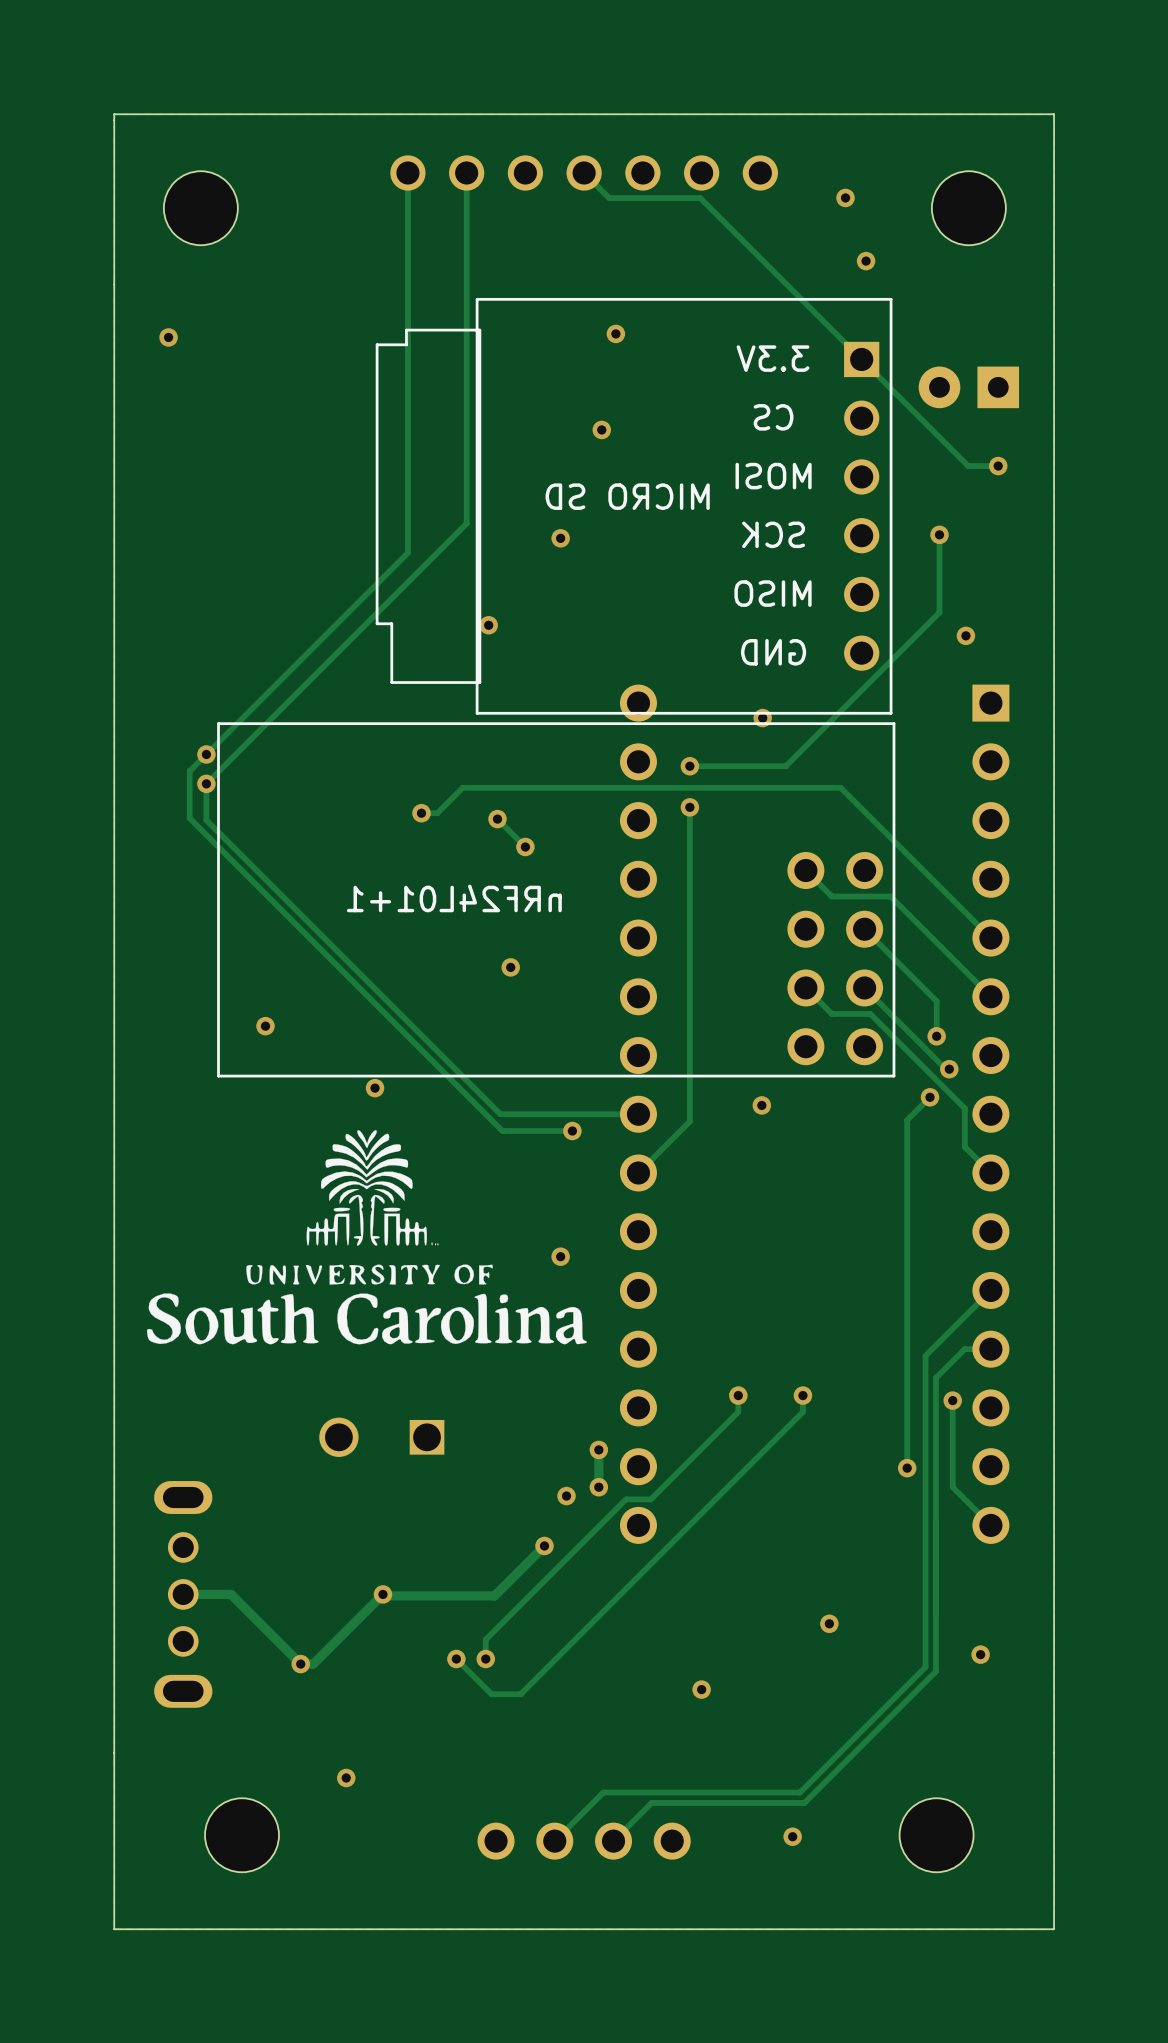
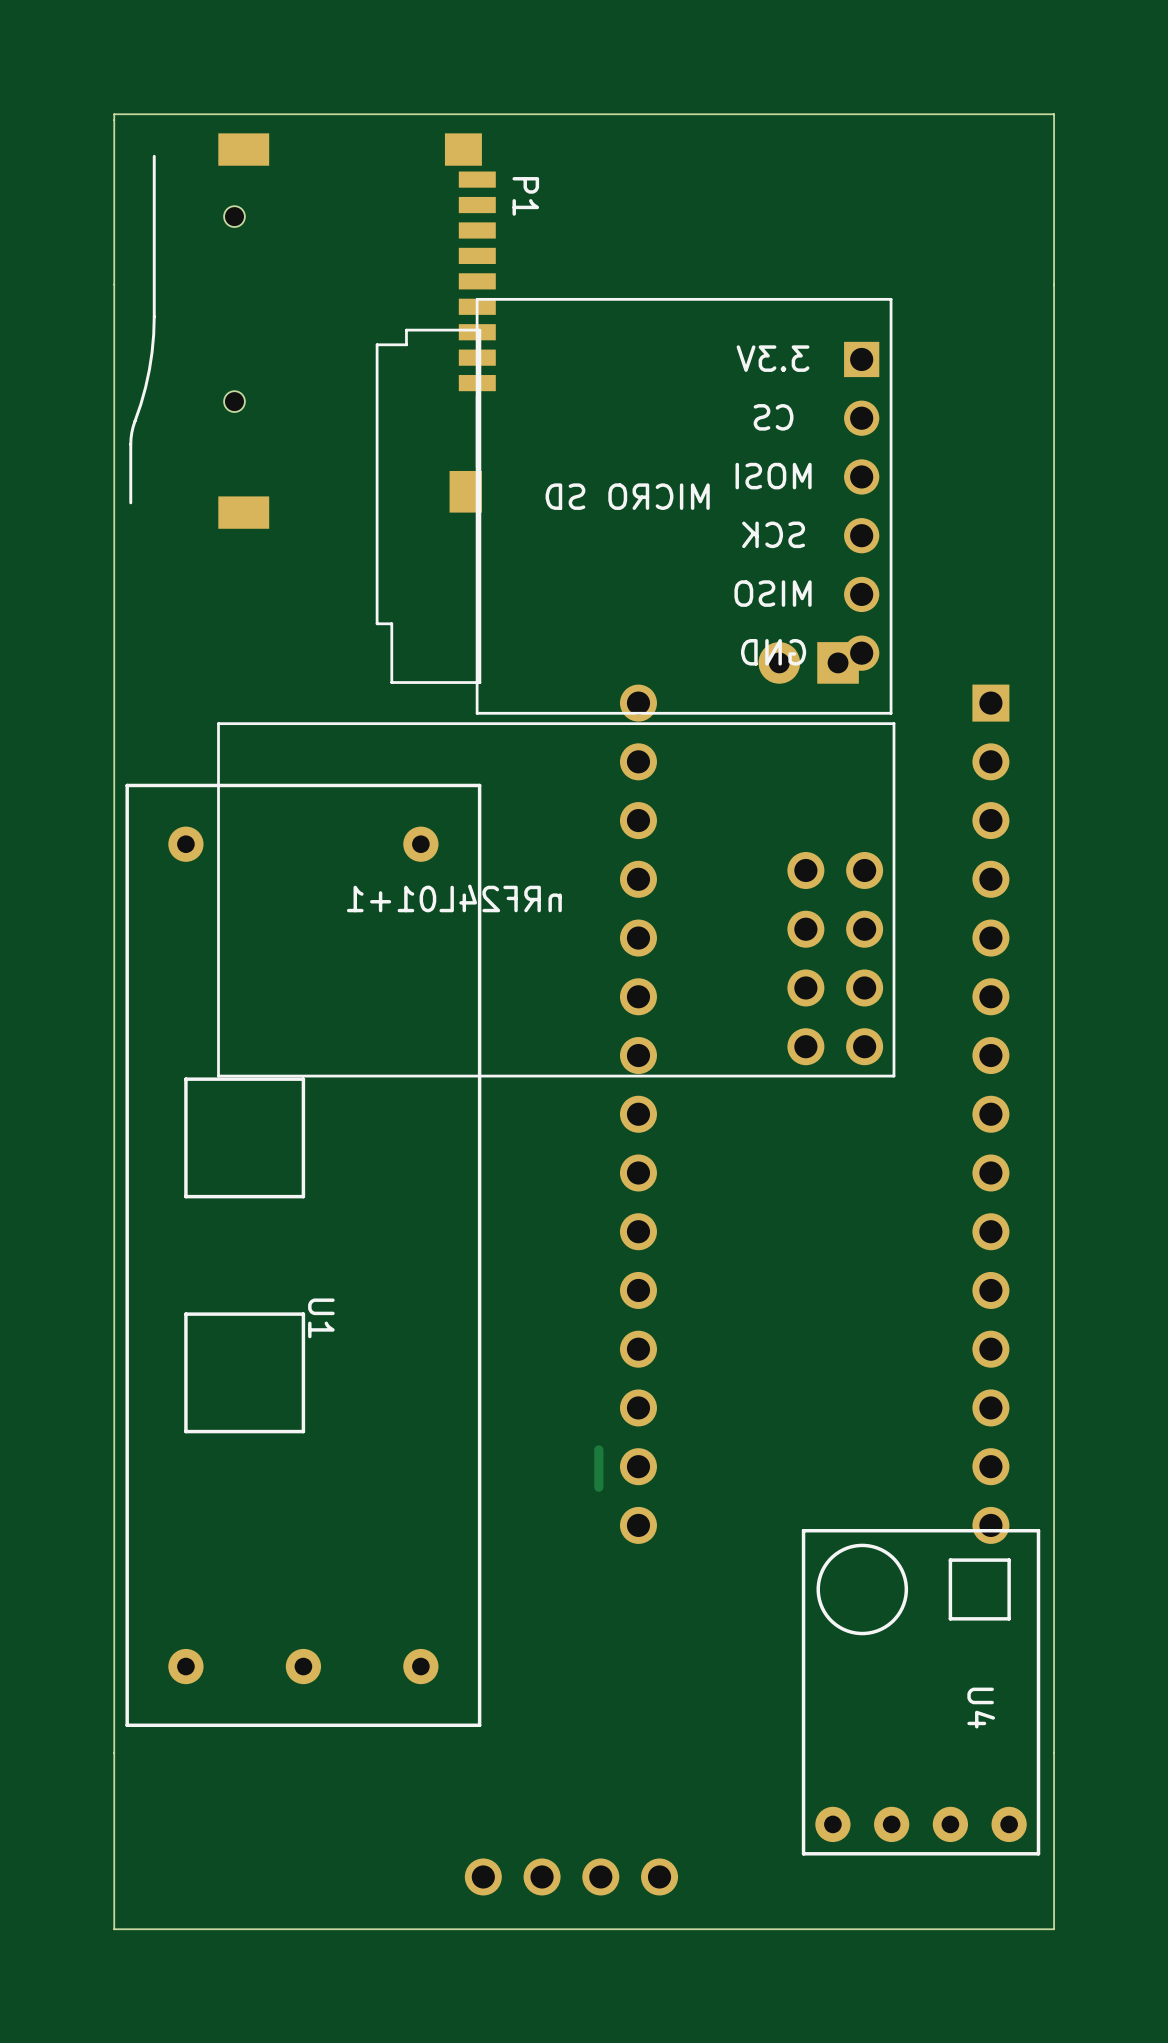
track: (407, 171) (407, 552) (189, 771) (189, 818) (502, 1131) (572, 1131) -> none
track: (466, 171) (466, 523) (206, 783) (206, 820) (500, 1114) (638, 1114) -> none
track: (584, 172) (609, 198) (700, 198) (968, 466) (998, 466) -> none
part: (584, 172) -> none
via: (845, 197) -> none
part: (200, 208) -> none
part: (968, 208) -> none
via: (866, 261) -> none
P1: none -> (312, 331)
via: (615, 333) -> none
via: (168, 337) -> none
part position: (968, 387) -> (808, 662)
via: (601, 429) -> none
via: (998, 466) -> none
track: (939, 534) (939, 612) (785, 766) (689, 766) -> none
via: (939, 534) -> none
via: (560, 538) -> none
via: (488, 625) -> none
via: (965, 635) -> none
via: (762, 718) -> none
via: (206, 754) -> none
via: (689, 766) -> none
via: (206, 783) -> none
track: (689, 807) (689, 1121) (638, 1172) -> none
via: (689, 807) -> none
track: (421, 813) (437, 813) (462, 787) (840, 787) (990, 938) -> none
via: (421, 813) -> none
track: (497, 819) (525, 847) -> none
via: (497, 819) -> none
via: (525, 847) -> none
track: (805, 870) (831, 896) (890, 896) (990, 996) -> none
track: (864, 929) (936, 1001) (936, 1036) -> none
via: (510, 967) -> none
track: (805, 987) (831, 1013) (870, 1013) (964, 1108) (964, 1146) (990, 1172) -> none
track: (864, 987) (945, 1069) (949, 1069) -> none
via: (265, 1026) -> none
via: (936, 1036) -> none
via: (949, 1069) -> none
via: (375, 1088) -> none
track: (930, 1097) (907, 1120) (907, 1468) -> none
via: (930, 1097) -> none
via: (761, 1105) -> none
drawing: [146, 1130, 587, 1345] -> none
via: (572, 1131) -> none
U1: none -> (303, 1255)
via: (560, 1256) -> none
track: (990, 1290) (925, 1355) (925, 1667) (800, 1792) (603, 1792) (554, 1841) -> none
track: (990, 1349) (964, 1349) (935, 1377) (935, 1671) (804, 1802) (651, 1802) (613, 1841) -> none
track: (738, 1395) (738, 1412) (650, 1499) (625, 1499) (485, 1639) (485, 1659) -> none
via: (738, 1395) -> none
track: (802, 1395) (802, 1412) (520, 1694) (491, 1694) (456, 1659) -> none
via: (802, 1395) -> none
track: (952, 1400) (952, 1487) (990, 1525) -> none
via: (952, 1400) -> none
part: (381, 1437) -> none
via: (598, 1449) -> none
via: (907, 1468) -> none
via: (598, 1487) -> none
via: (566, 1496) -> none
track: (544, 1545) (494, 1595) (382, 1594) (313, 1664) (300, 1664) (231, 1594) (183, 1594) -> none
via: (544, 1545) -> none
part: (183, 1594) -> none
via: (382, 1594) -> none
via: (829, 1623) -> none
via: (980, 1654) -> none
via: (456, 1659) -> none
via: (485, 1659) -> none
via: (300, 1664) -> none
via: (701, 1689) -> none
U4: none -> (921, 1692)
via: (346, 1777) -> none
part: (242, 1835) -> none
part: (936, 1835) -> none
via: (792, 1836) -> none
part position: (584, 1841) -> (571, 1876)

